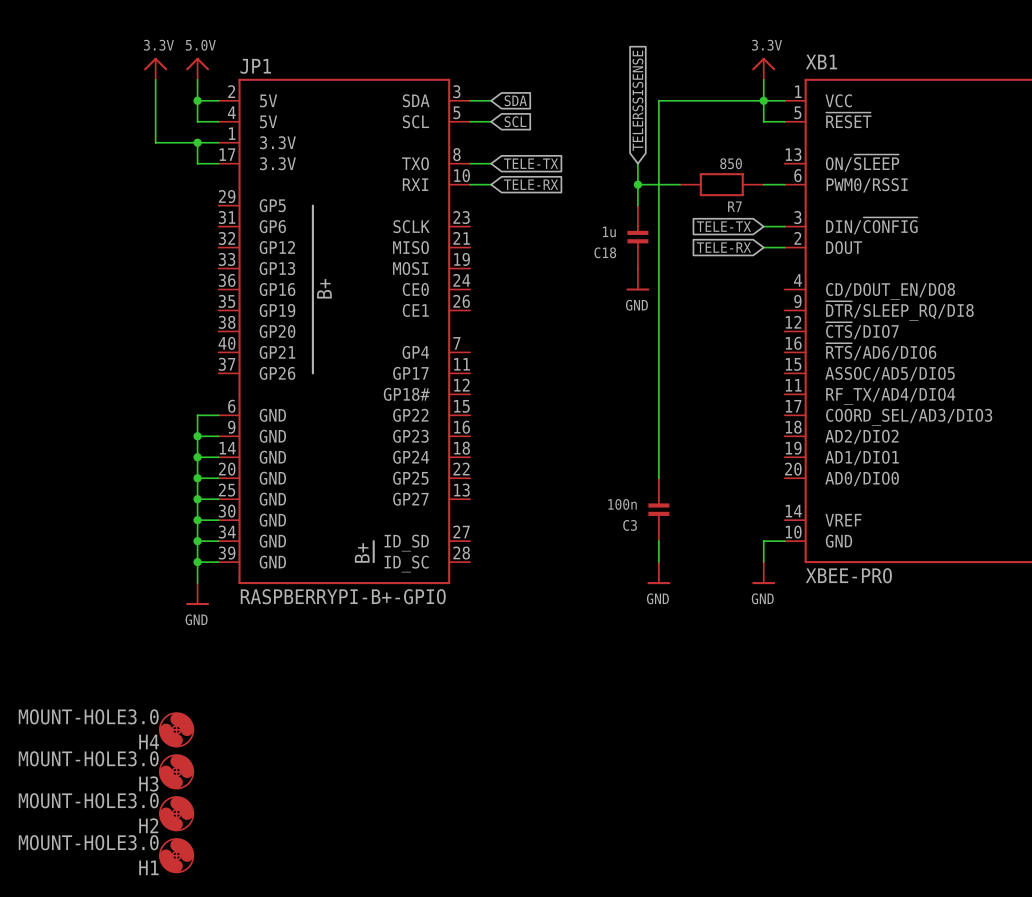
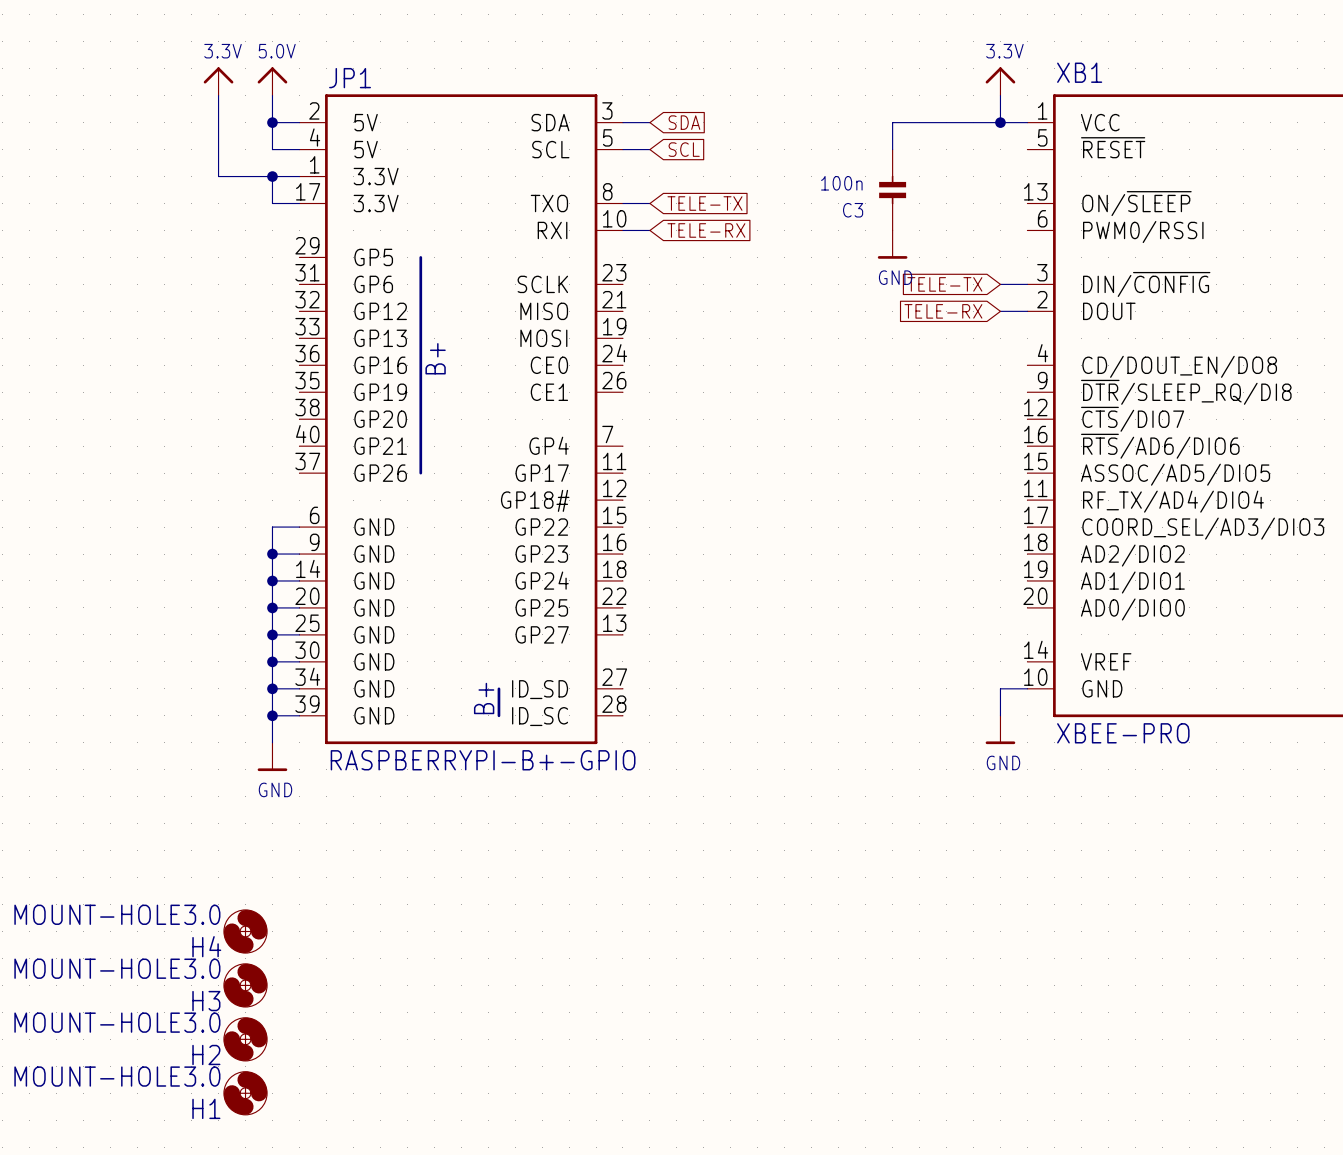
global label: TELERSSISENSE (637, 100) -> none
wire: (679, 100) (658, 100) (658, 478) -> (892, 122) (892, 149)
wire: (763, 100) (763, 121) (784, 121) -> none
wire: (637, 163) (637, 205) -> none
wire: (637, 184) (679, 184) -> none
junction: (637, 184) -> none
R7: 850 (721, 184) -> none
wire: (763, 184) (784, 184) -> none
C18: 1u (637, 237) -> none
power symbol position: GND (637, 279) -> GND (892, 244)
C3 position: (658, 509) -> (892, 190)
wire: (658, 541) (658, 562) -> none
power symbol: GND (658, 573) -> none

